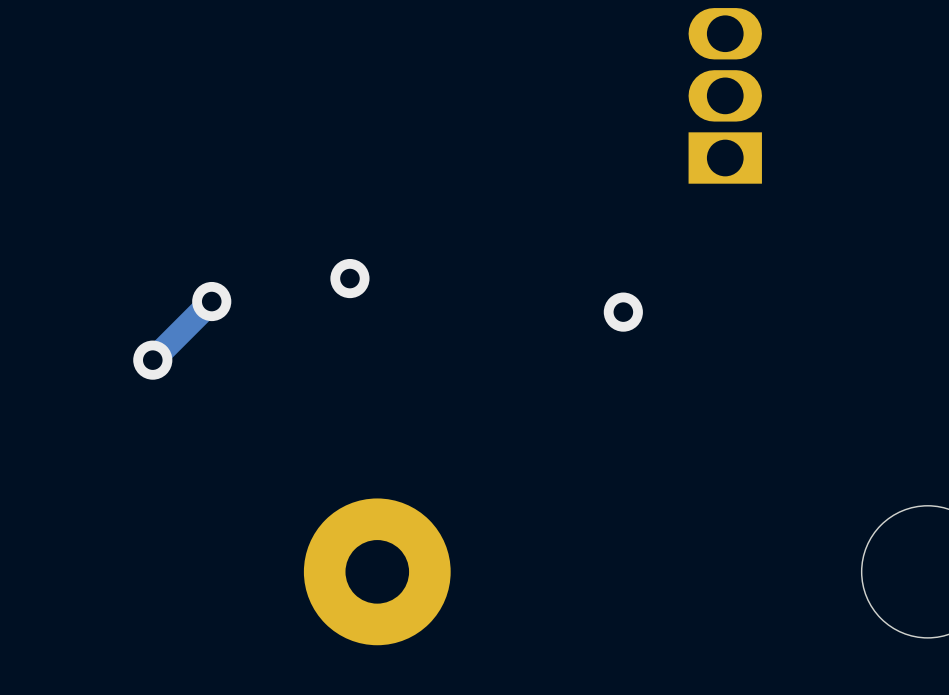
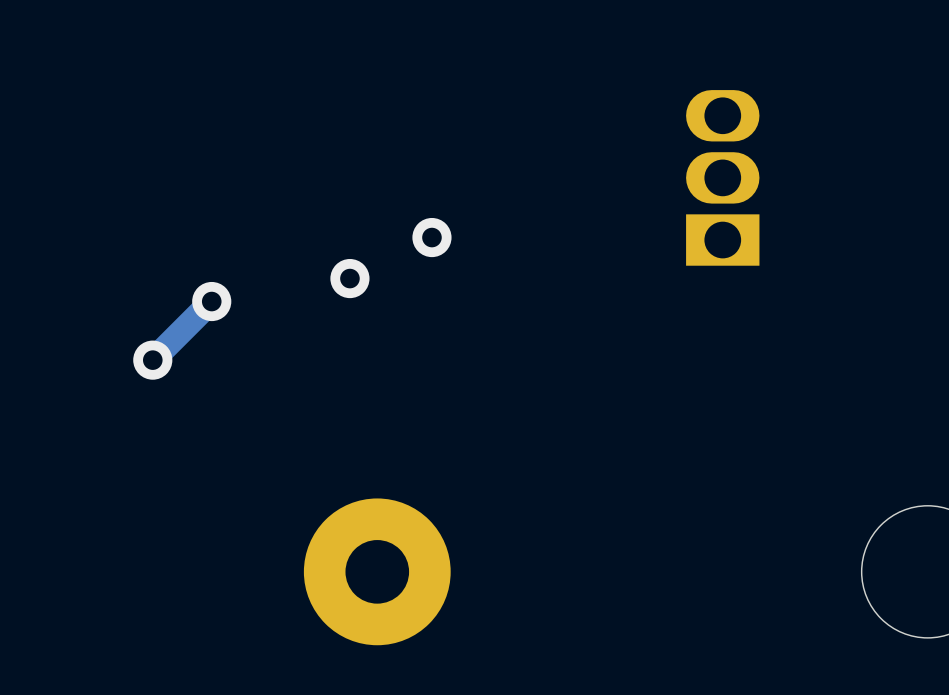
part position: (725, 95) -> (722, 177)
via position: (623, 312) -> (431, 237)

